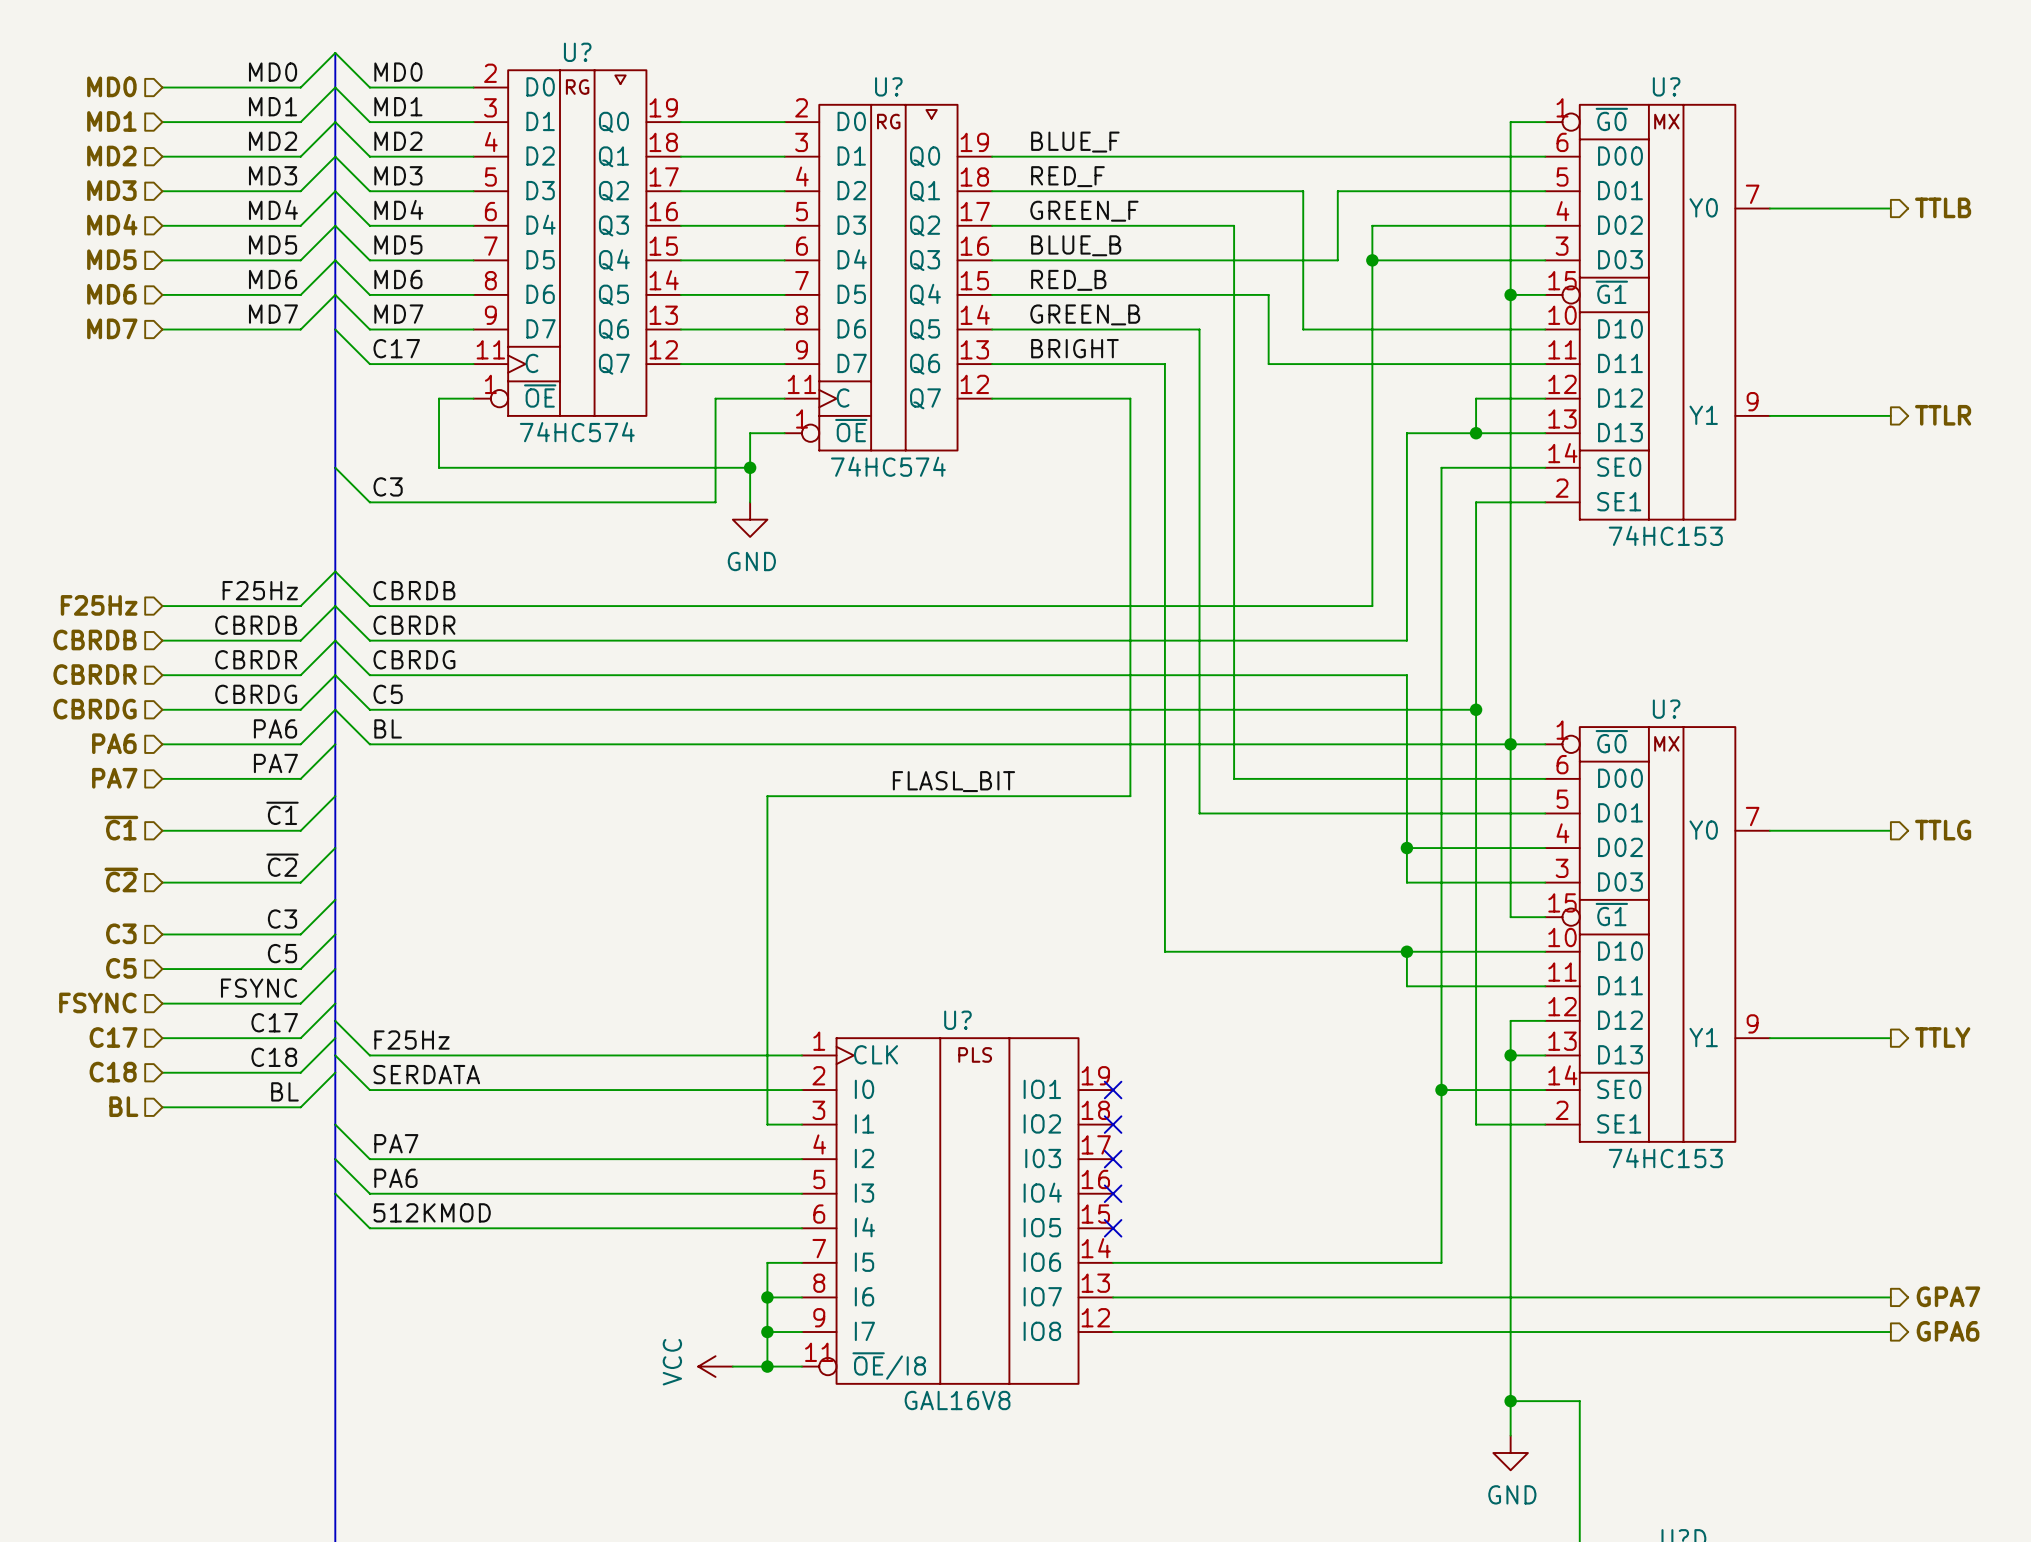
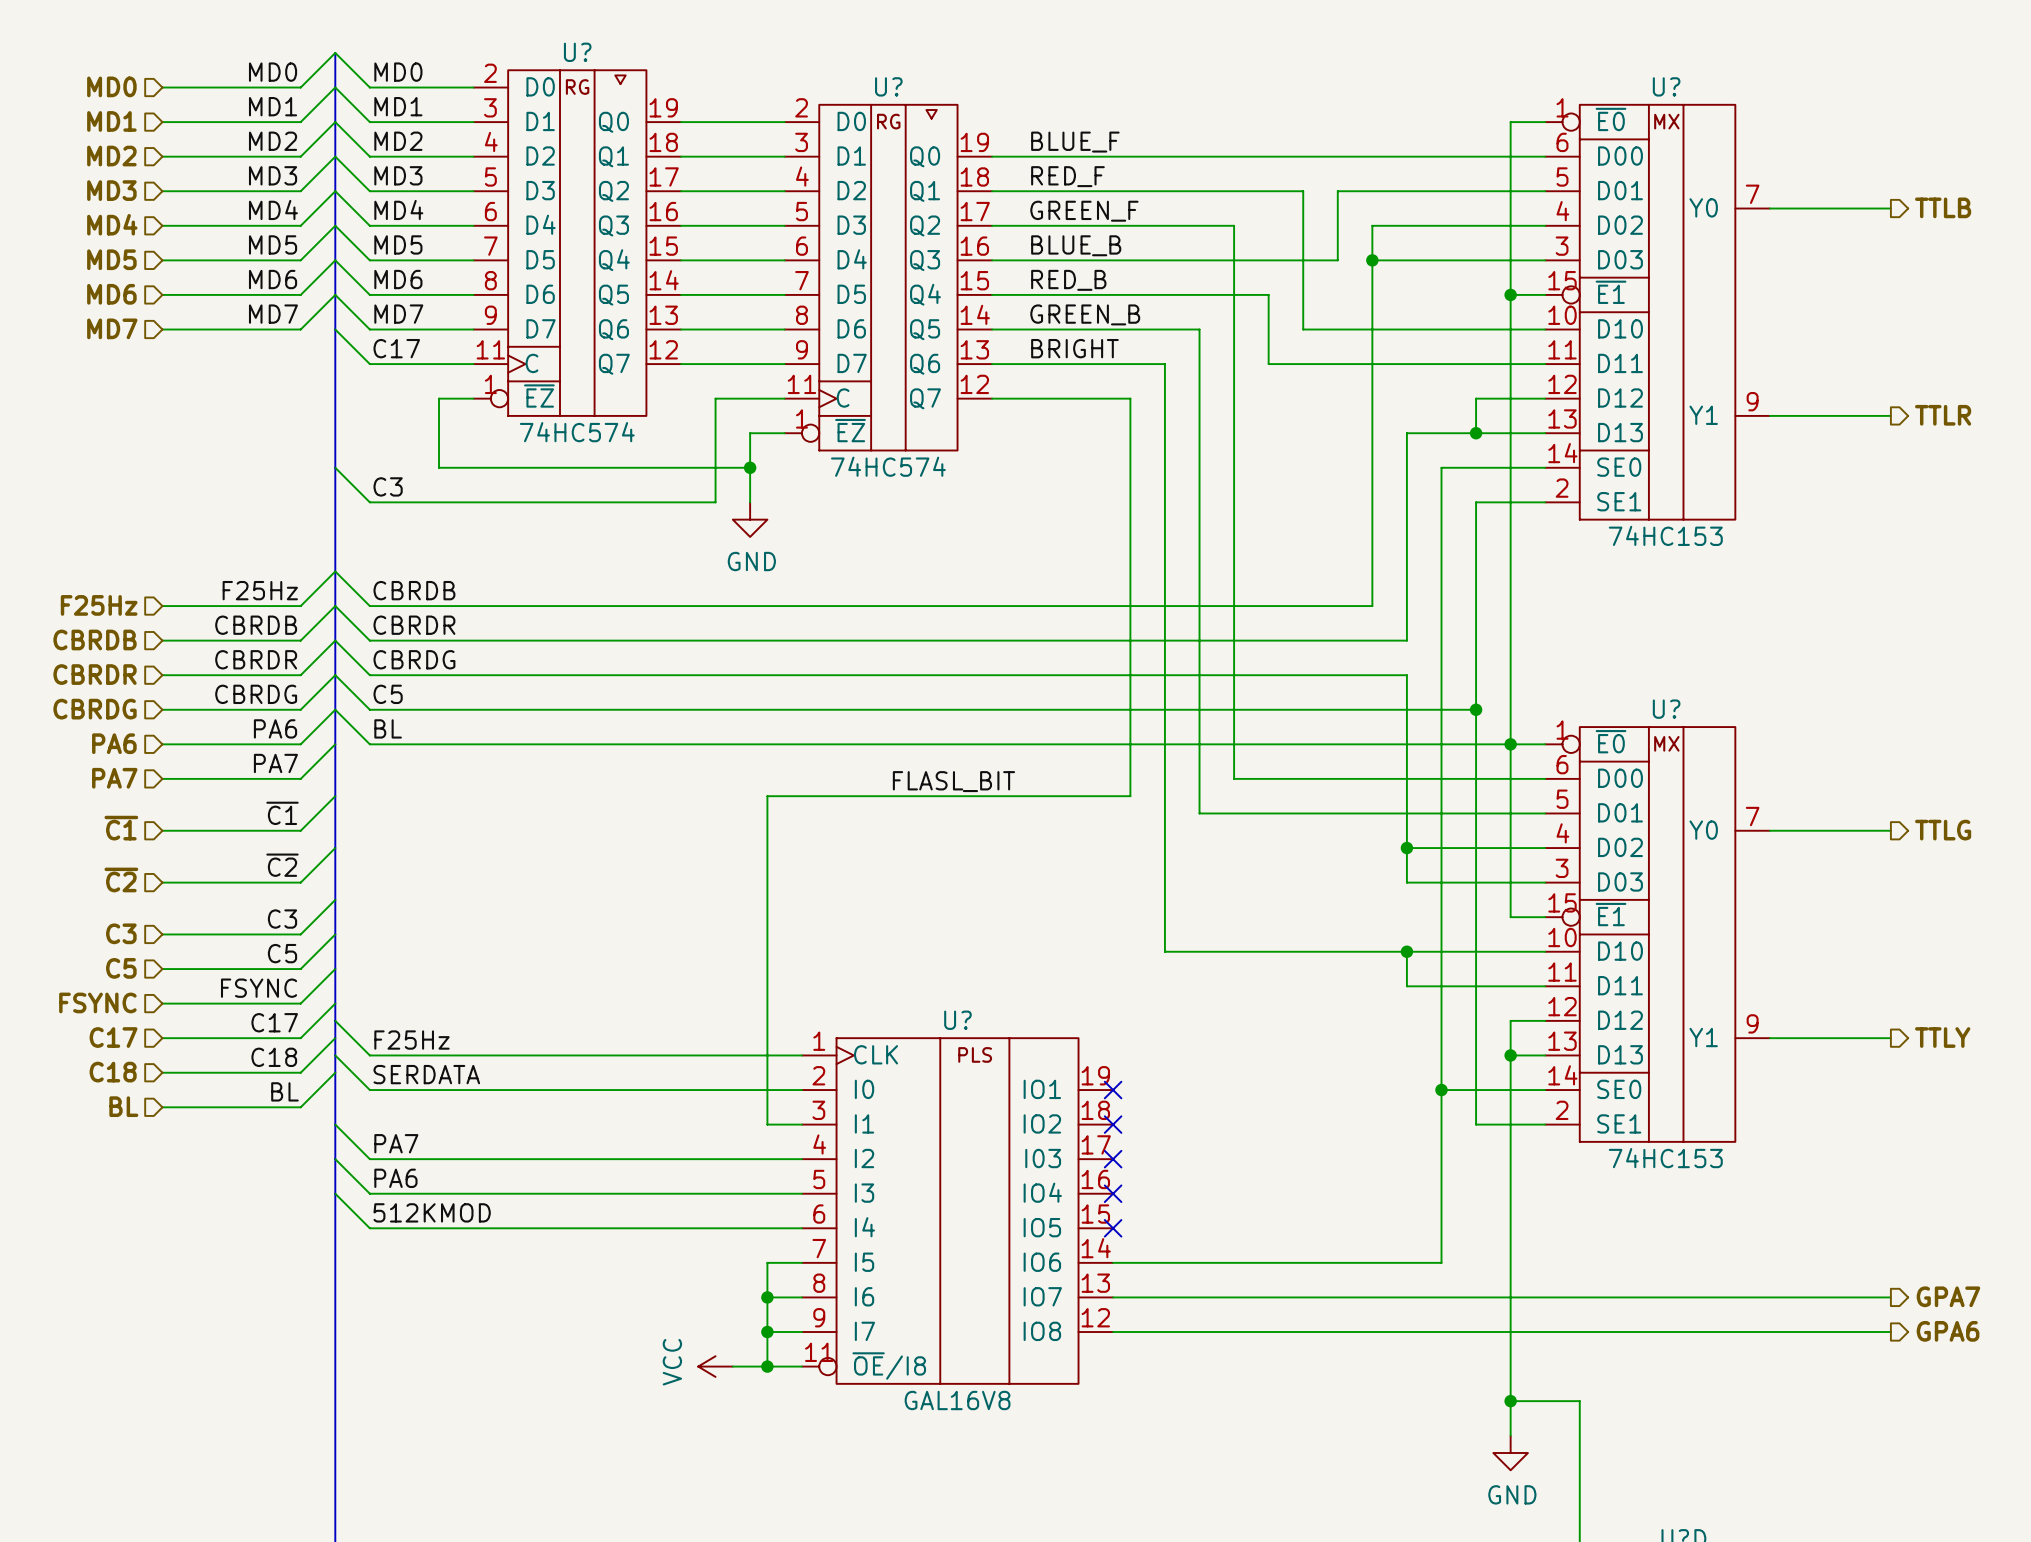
U? pin name: ~{G0} (1611, 119) -> ~{E0} (1611, 119)
U? pin name: ~{G1} (1611, 292) -> ~{E1} (1611, 292)
U? pin name: ~{OE} (540, 396) -> ~{EZ} (539, 396)
U? pin name: ~{OE} (851, 430) -> ~{EZ} (850, 430)
U? pin name: ~{G0} (1611, 741) -> ~{E0} (1611, 741)
U? pin name: ~{G1} (1611, 914) -> ~{E1} (1611, 914)

